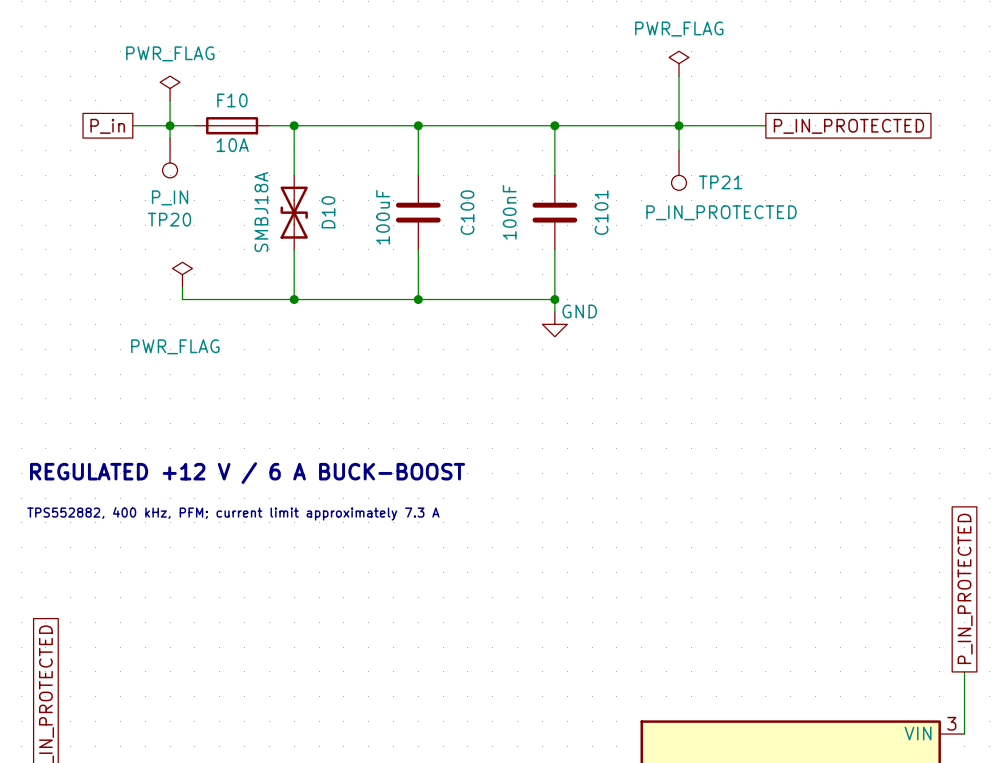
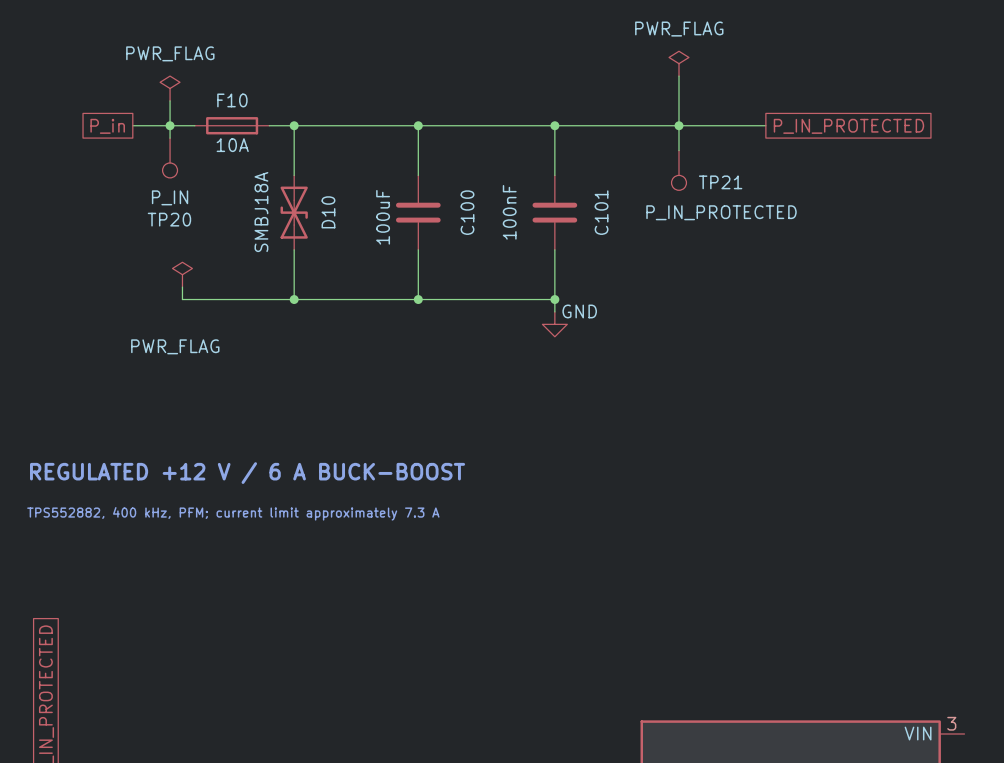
global label: P_IN_PROTECTED (965, 588) -> none
wire: (964, 671) (964, 734) -> none

